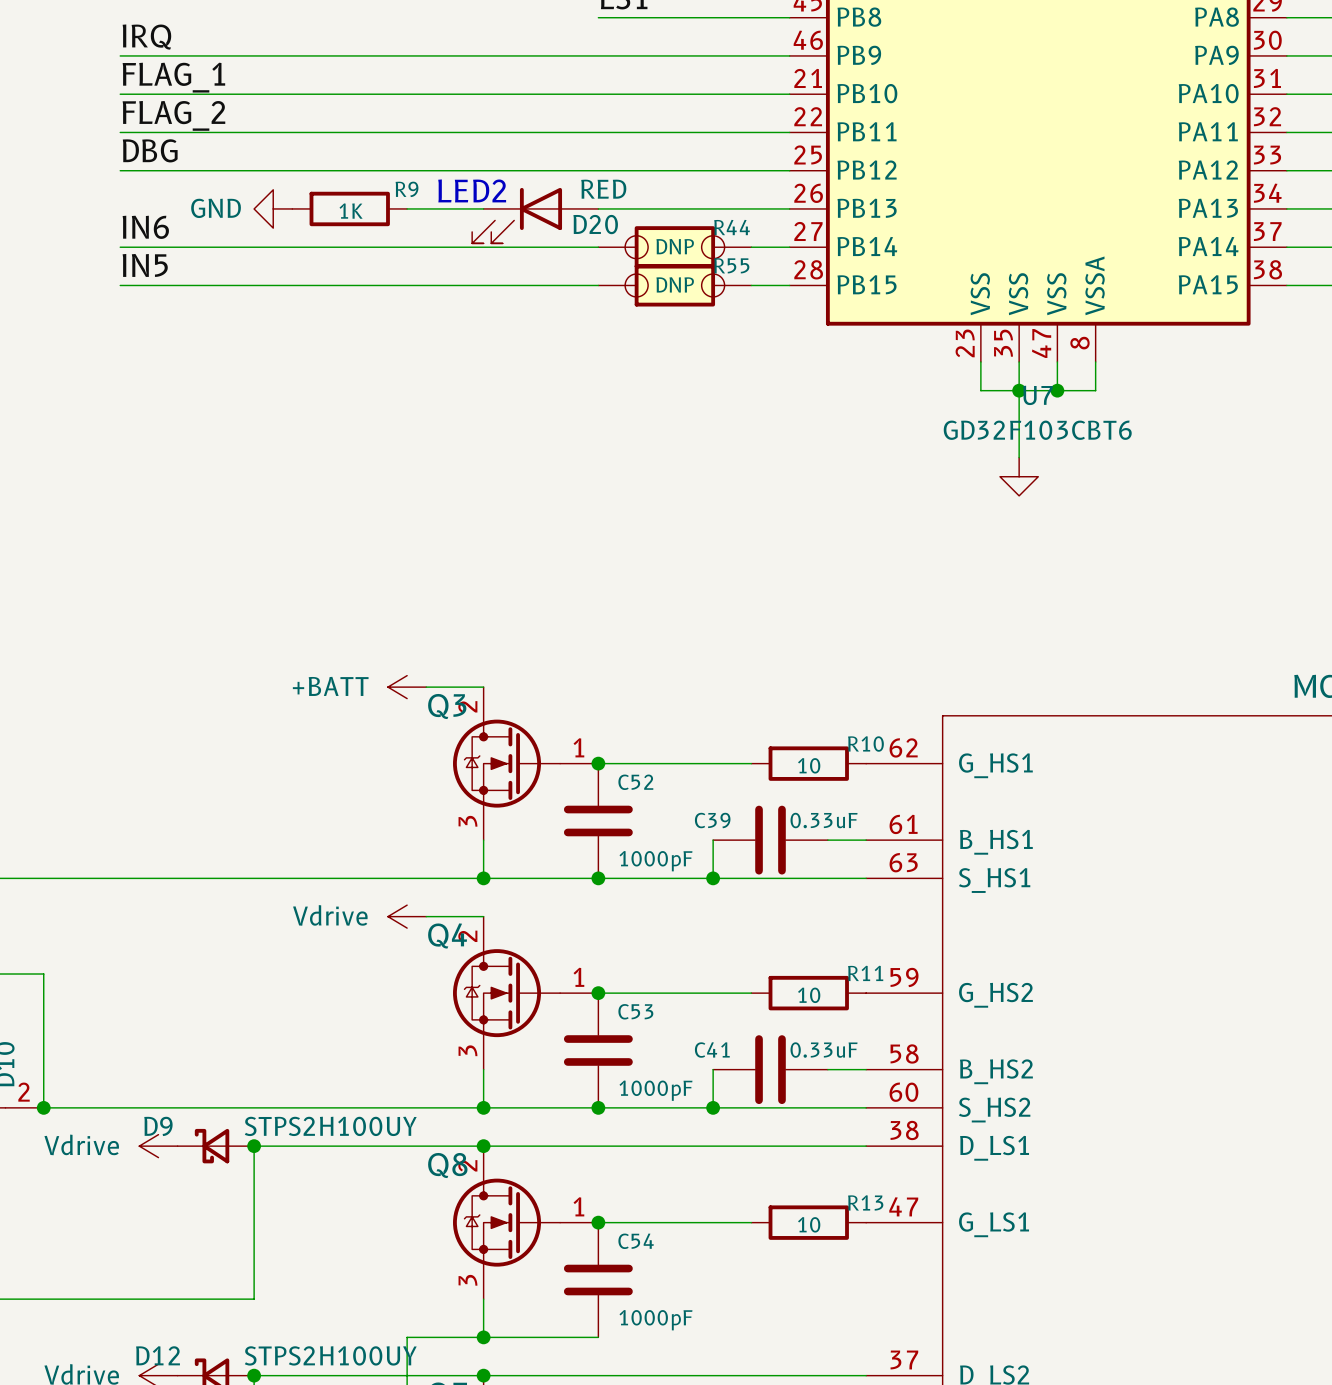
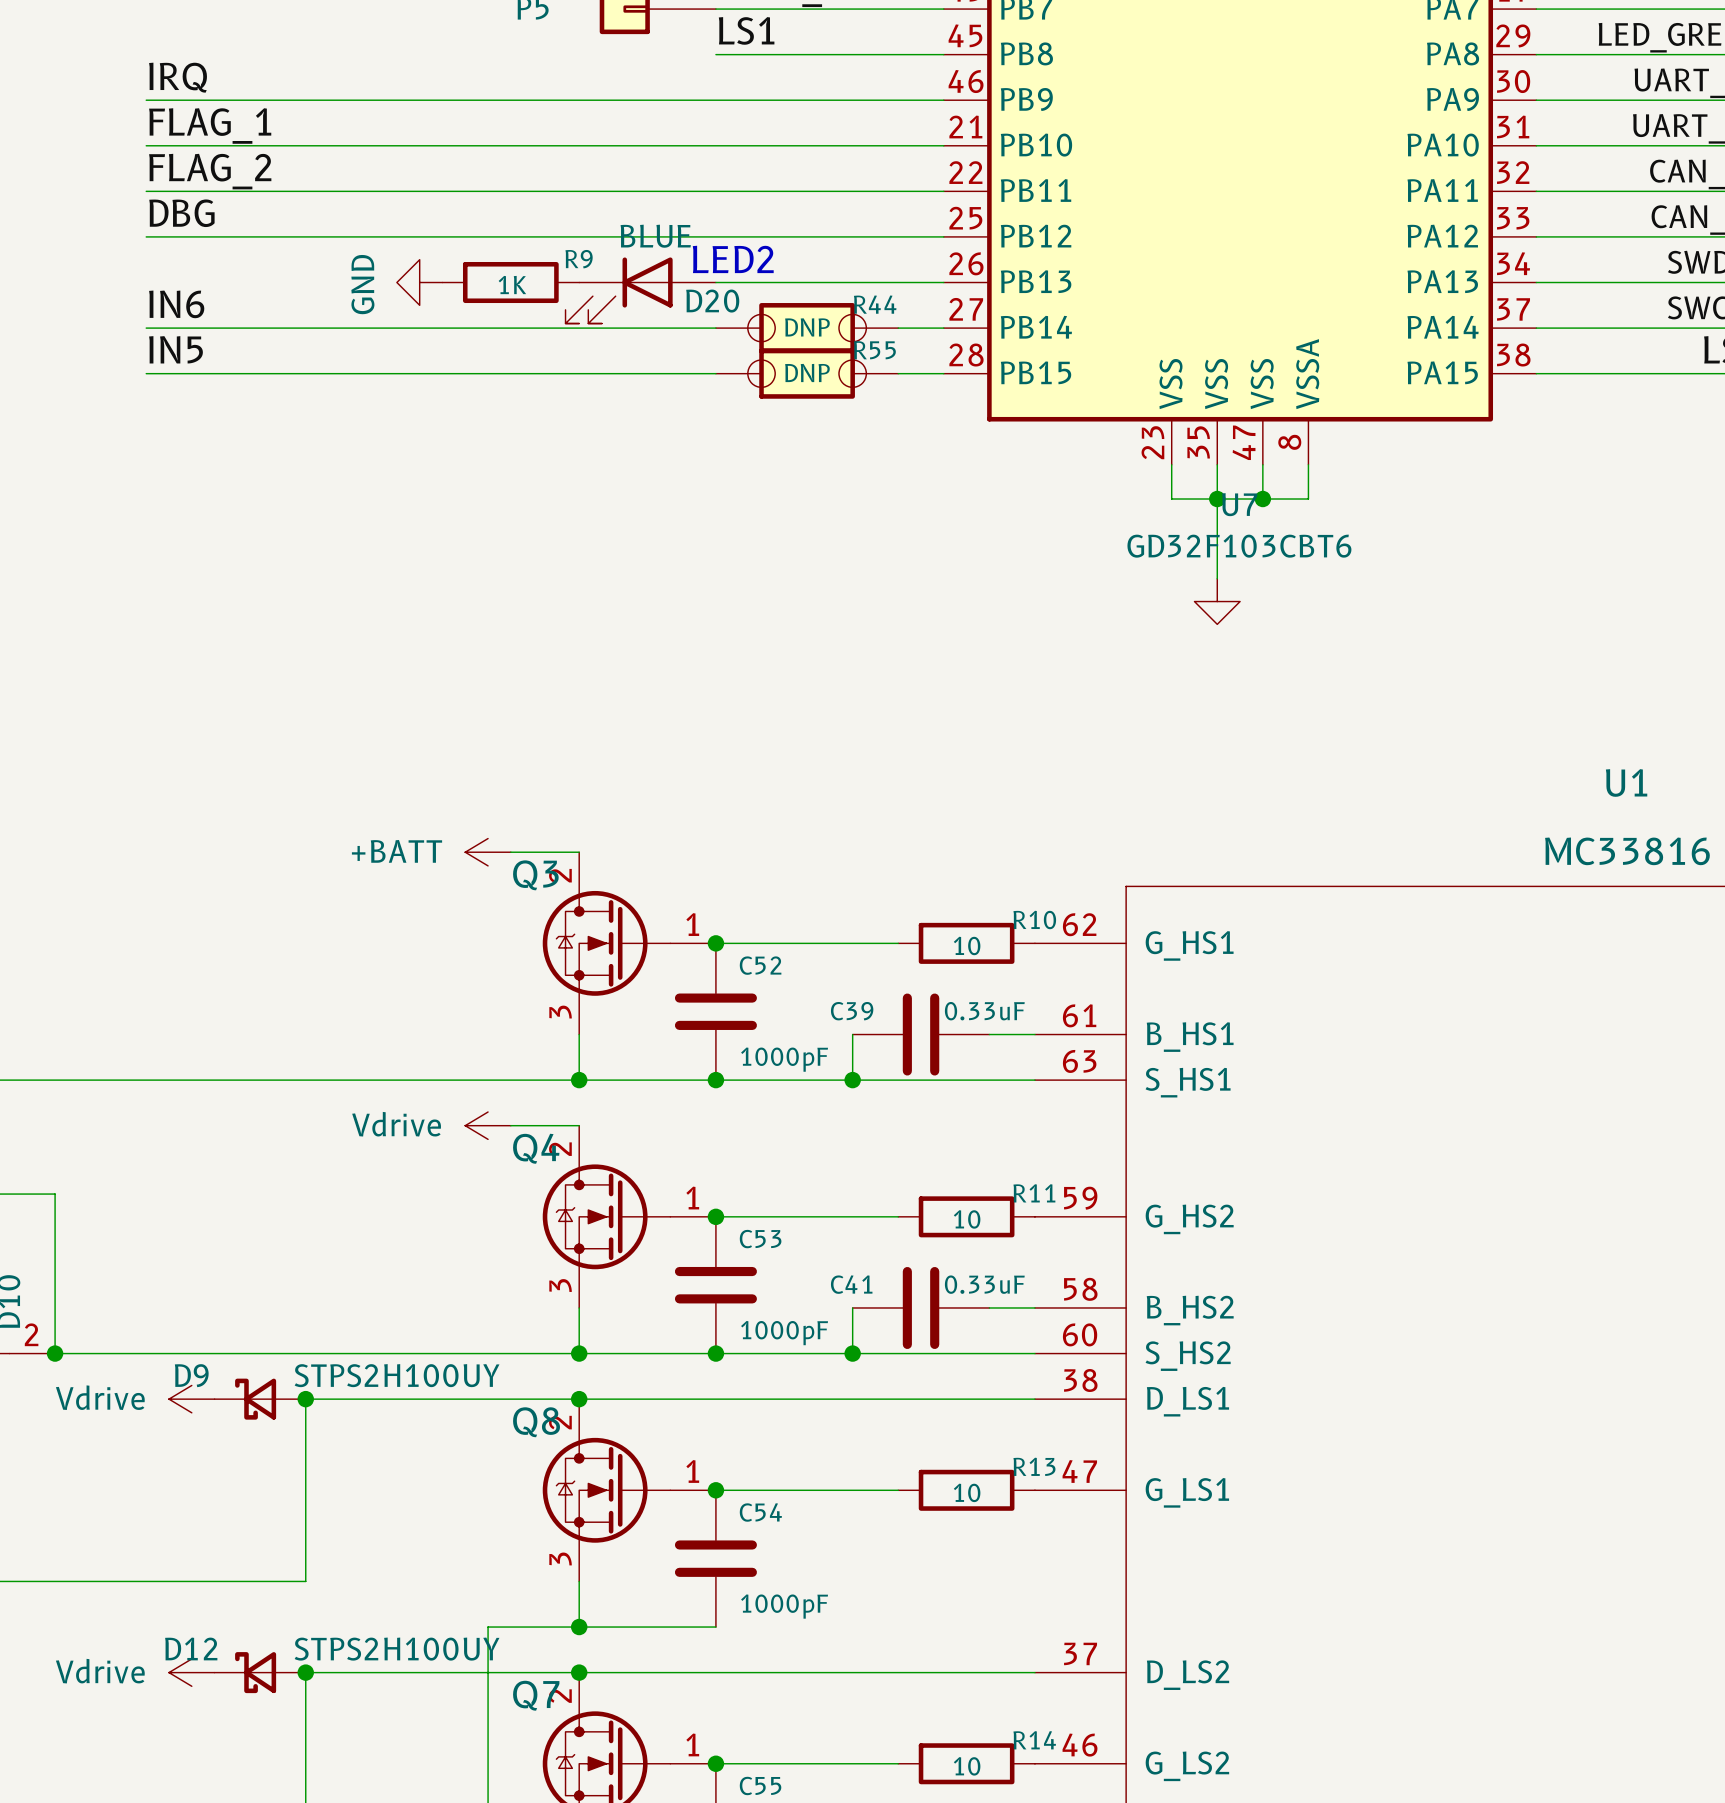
D20 value: RED (603, 189) -> BLUE (655, 236)
text position: LED2 (472, 190) -> LED2 (733, 259)
power symbol text rotation: 0° (216, 208) -> 90° counterclockwise (362, 284)
power symbol position: GND (273, 208) -> GND (419, 282)
R9 position: (349, 208) -> (510, 282)
wire: (407, 208) (483, 208) -> none

